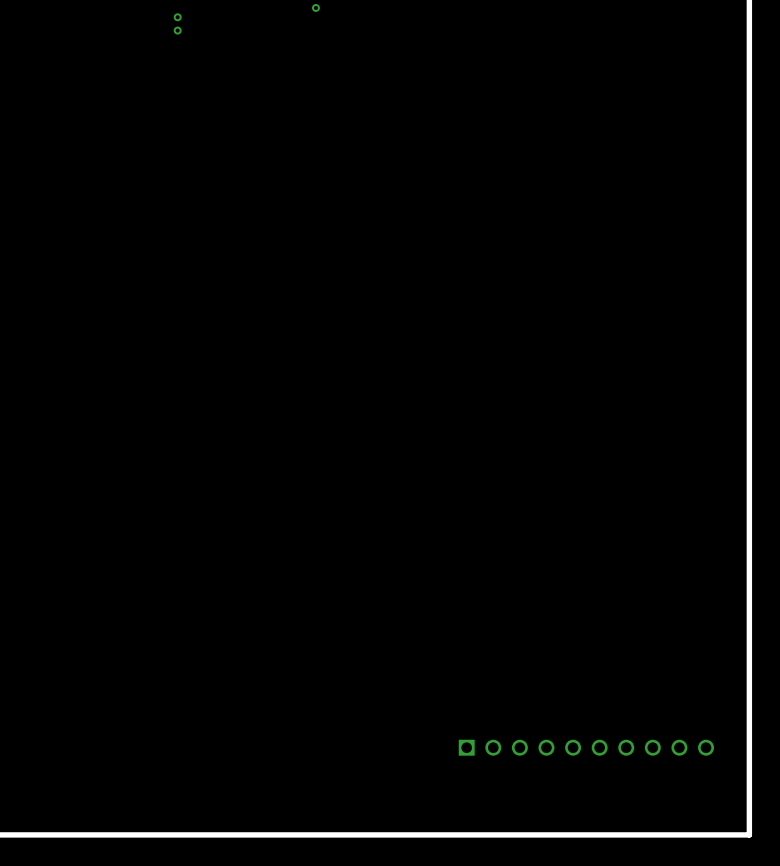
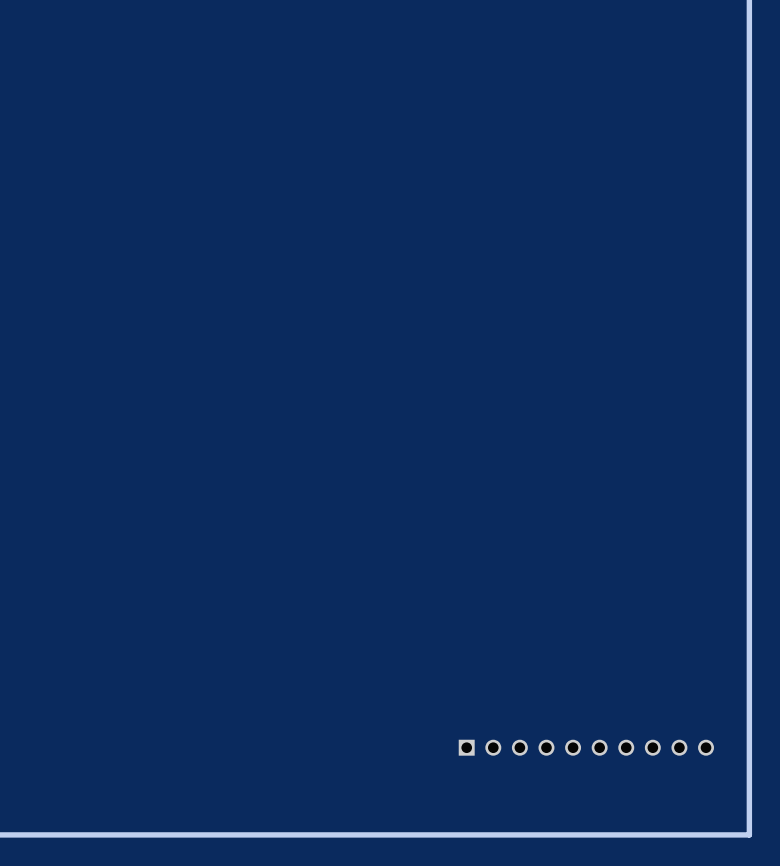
via: (315, 7) -> none
via: (177, 17) -> none
via: (177, 30) -> none

